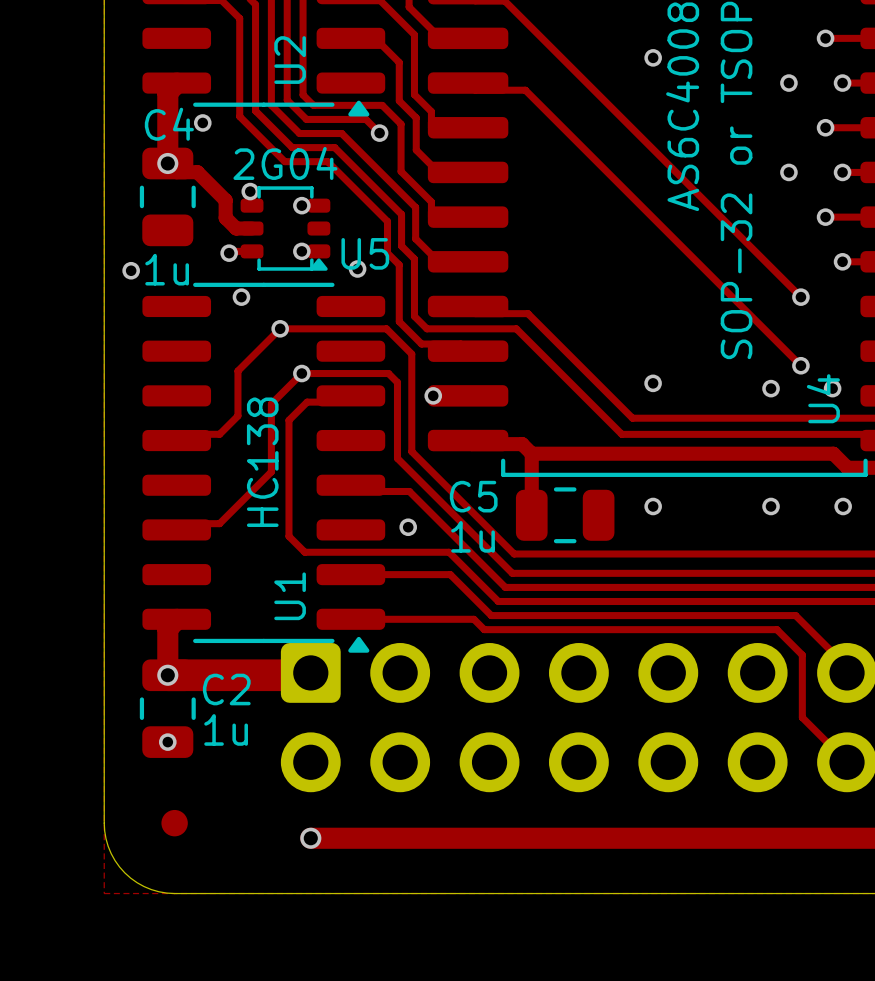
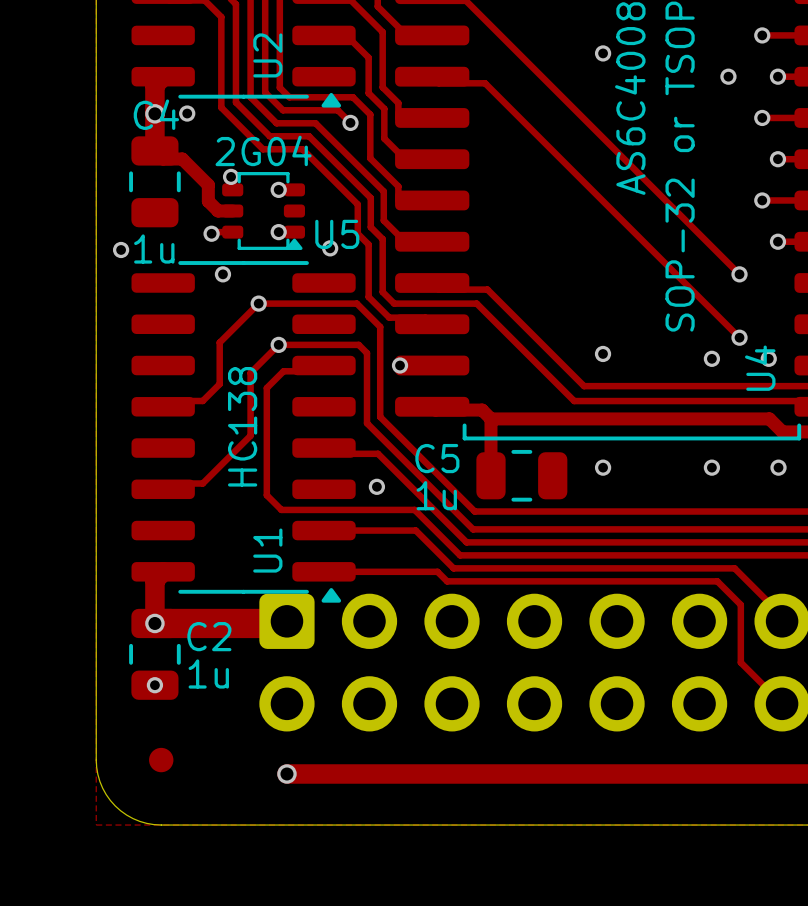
via position: (167, 163) -> (154, 113)
via: (788, 172) -> none

